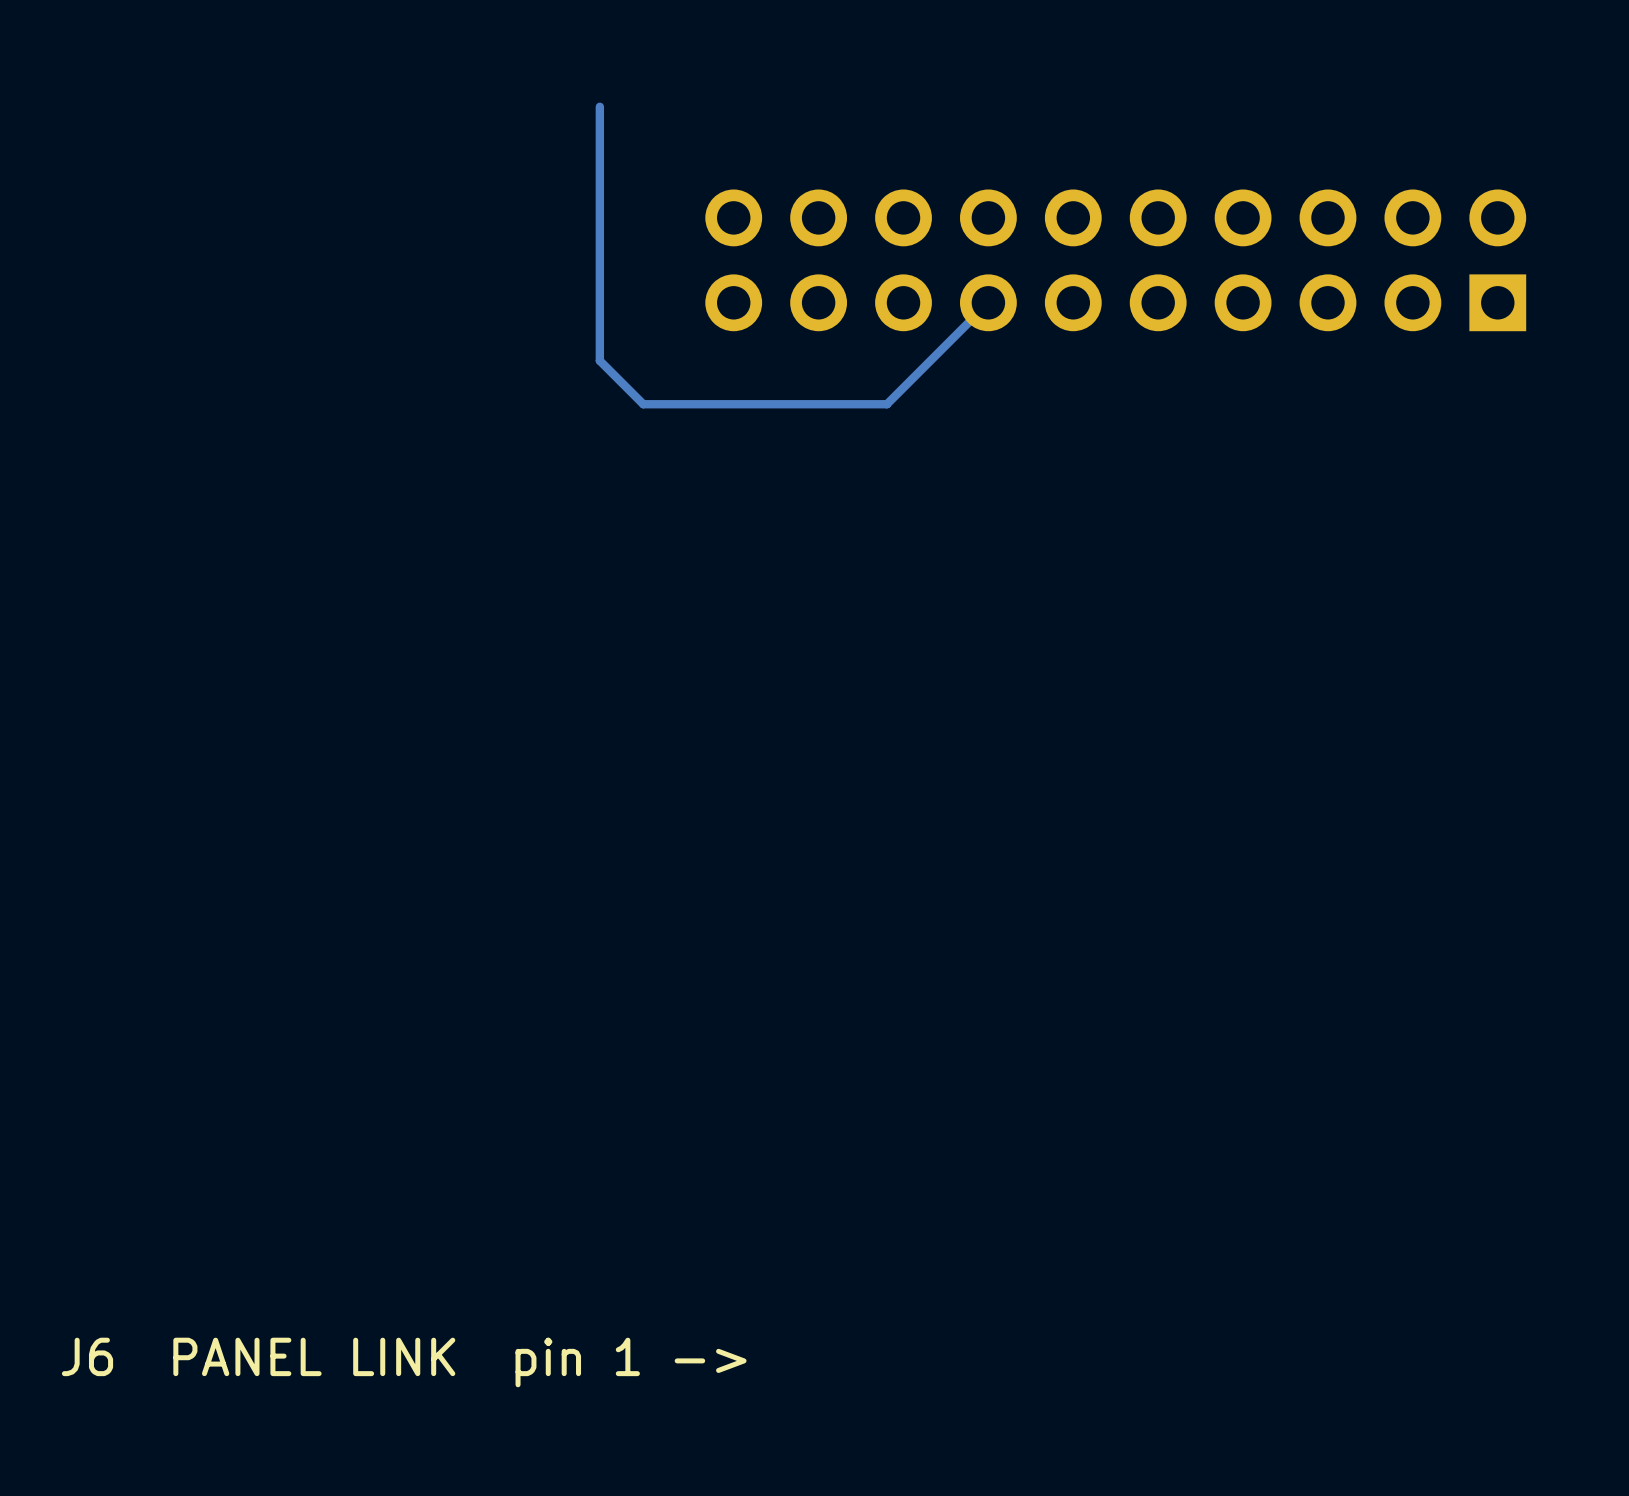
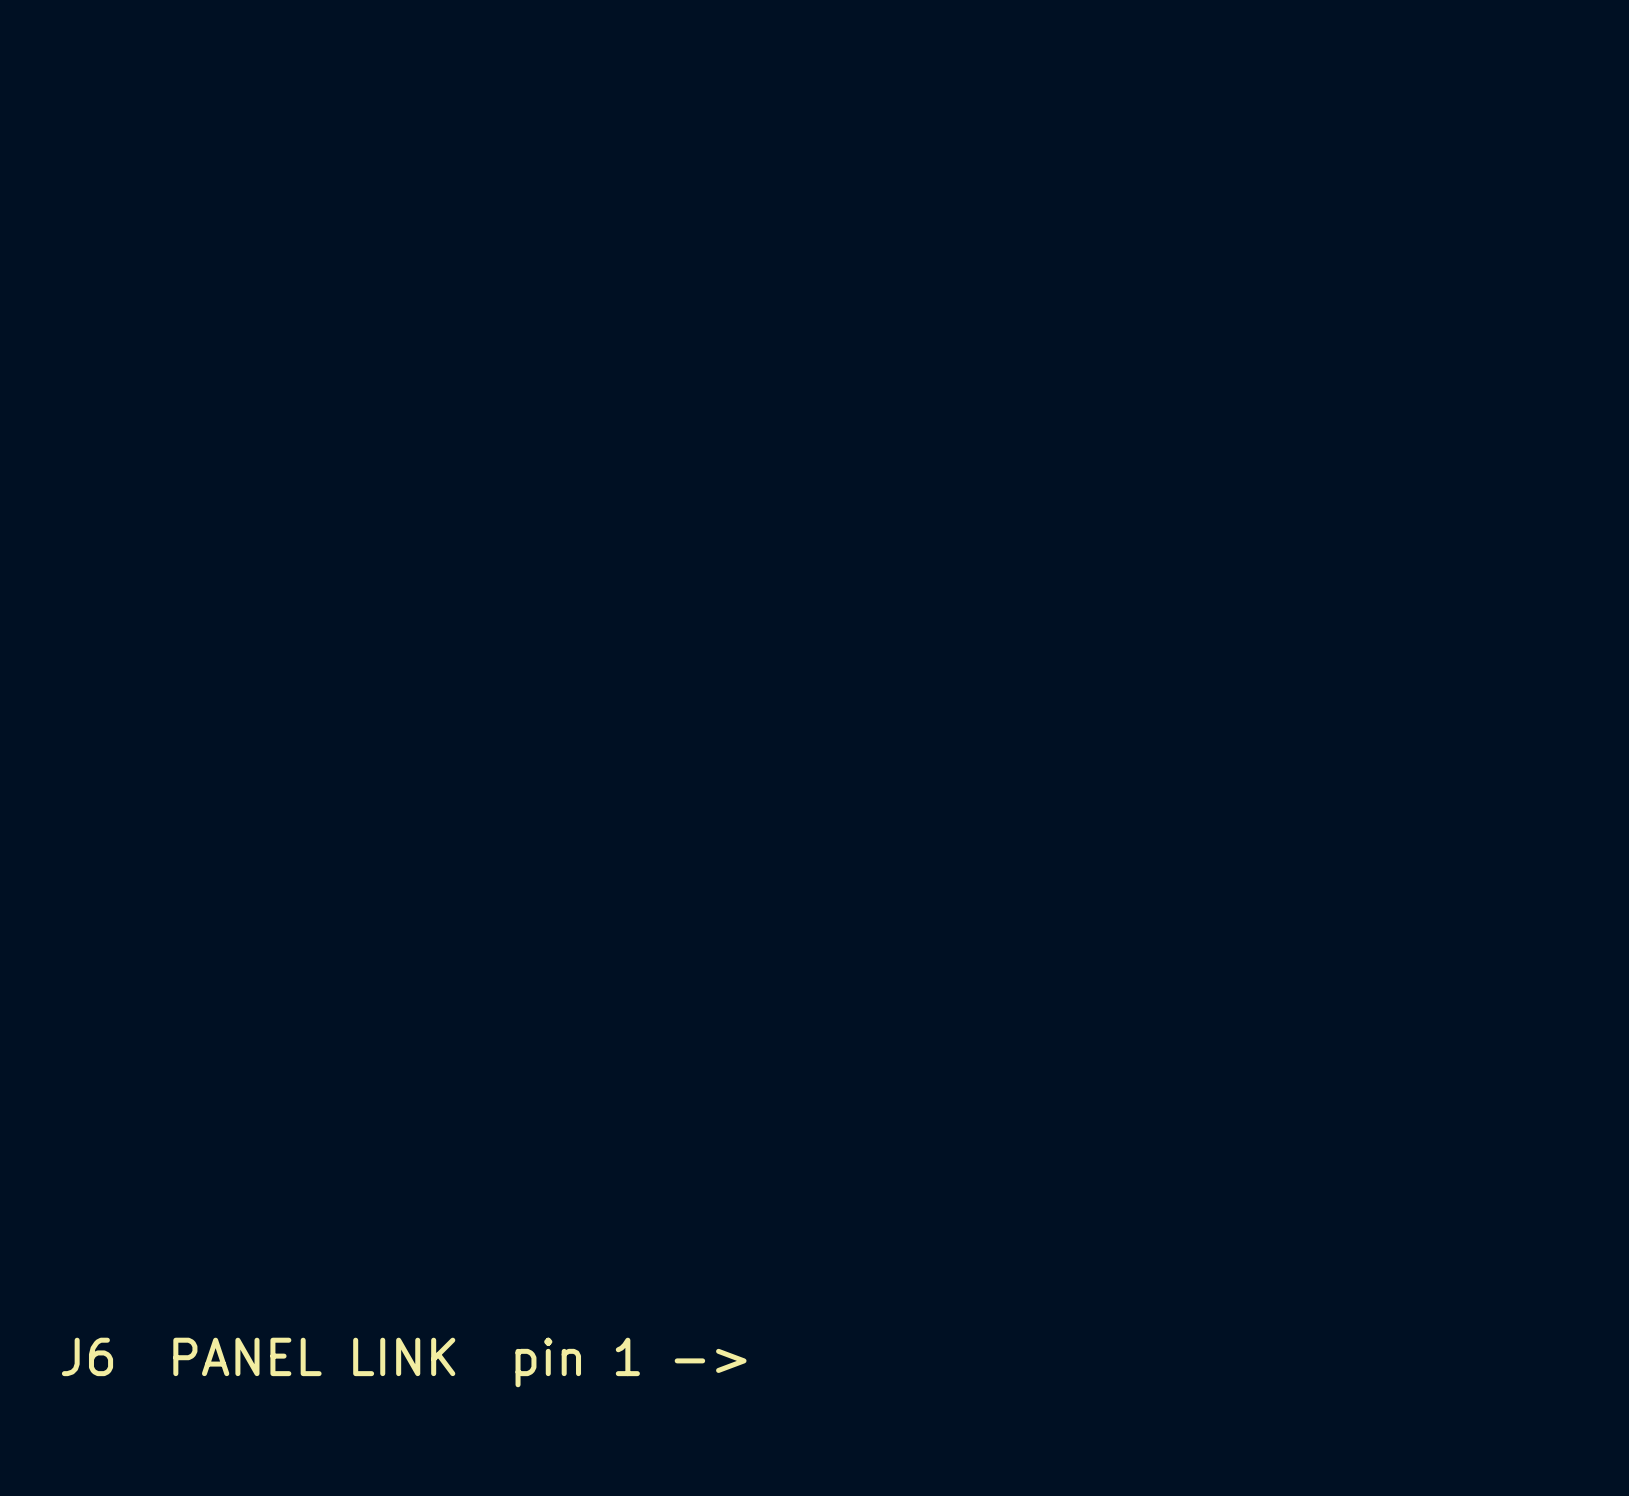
track: (599, 106) (599, 360) (643, 404) (886, 404) (988, 302) -> none
part: (1115, 260) -> none

